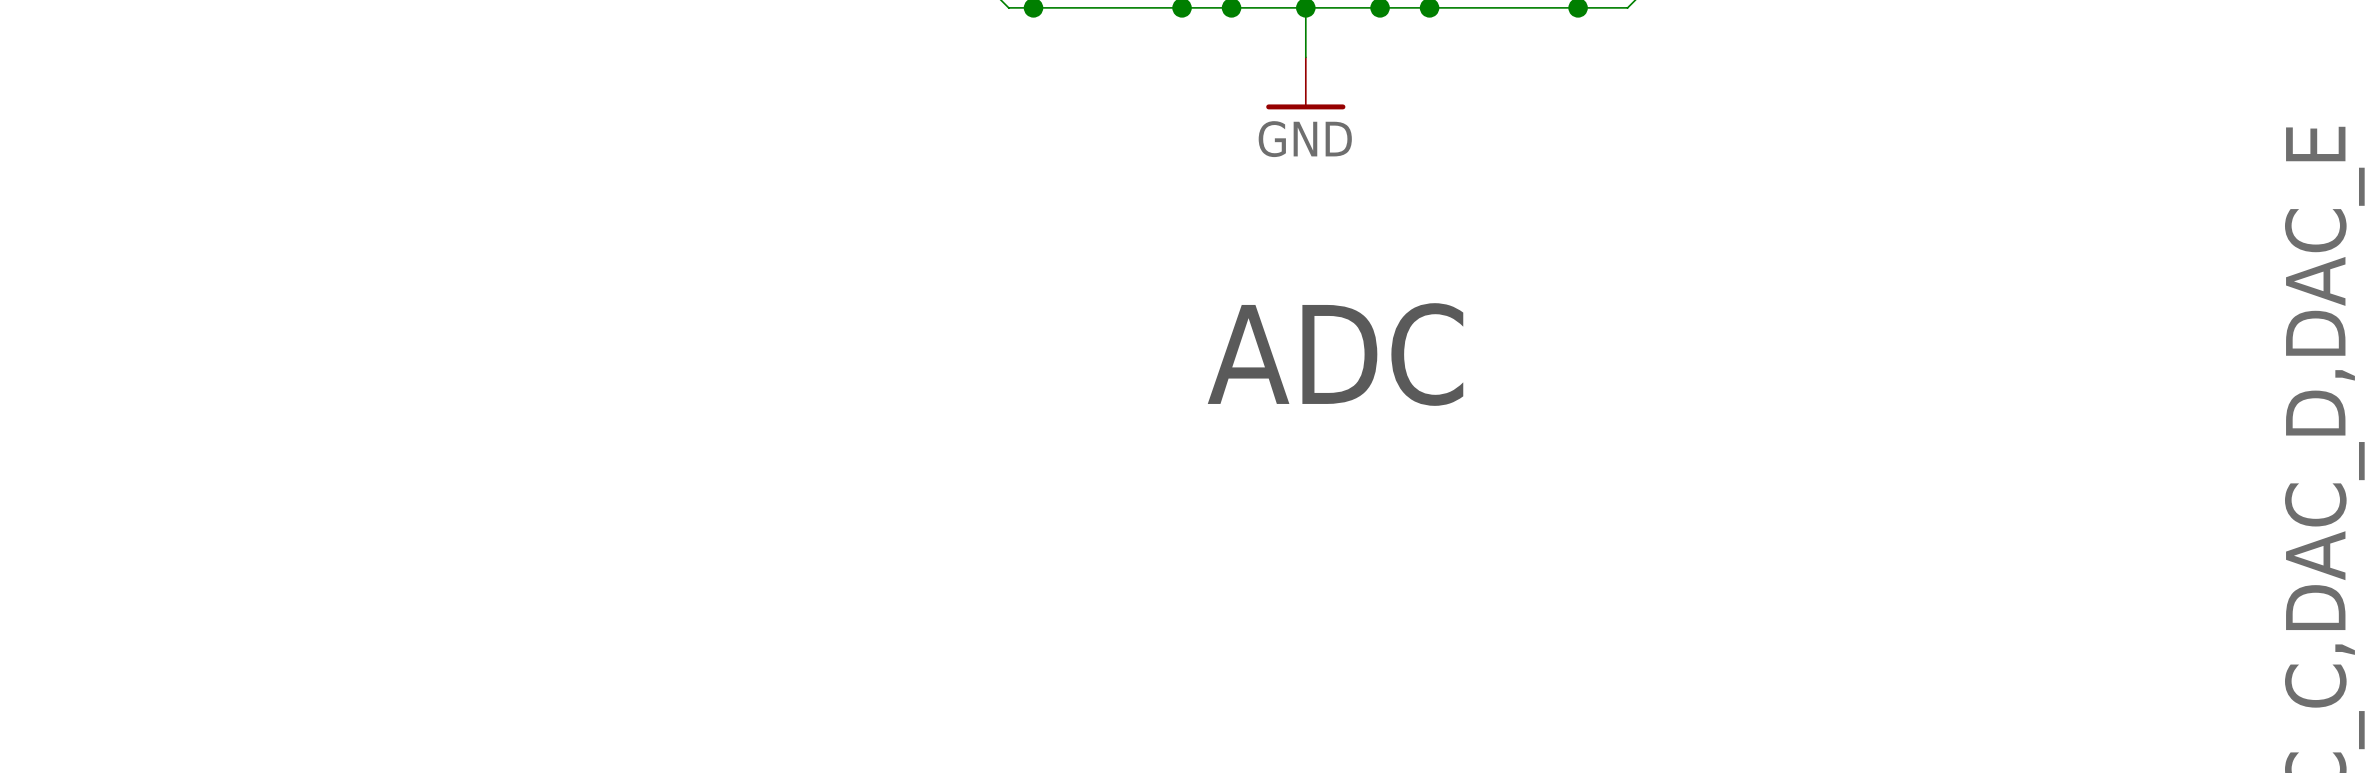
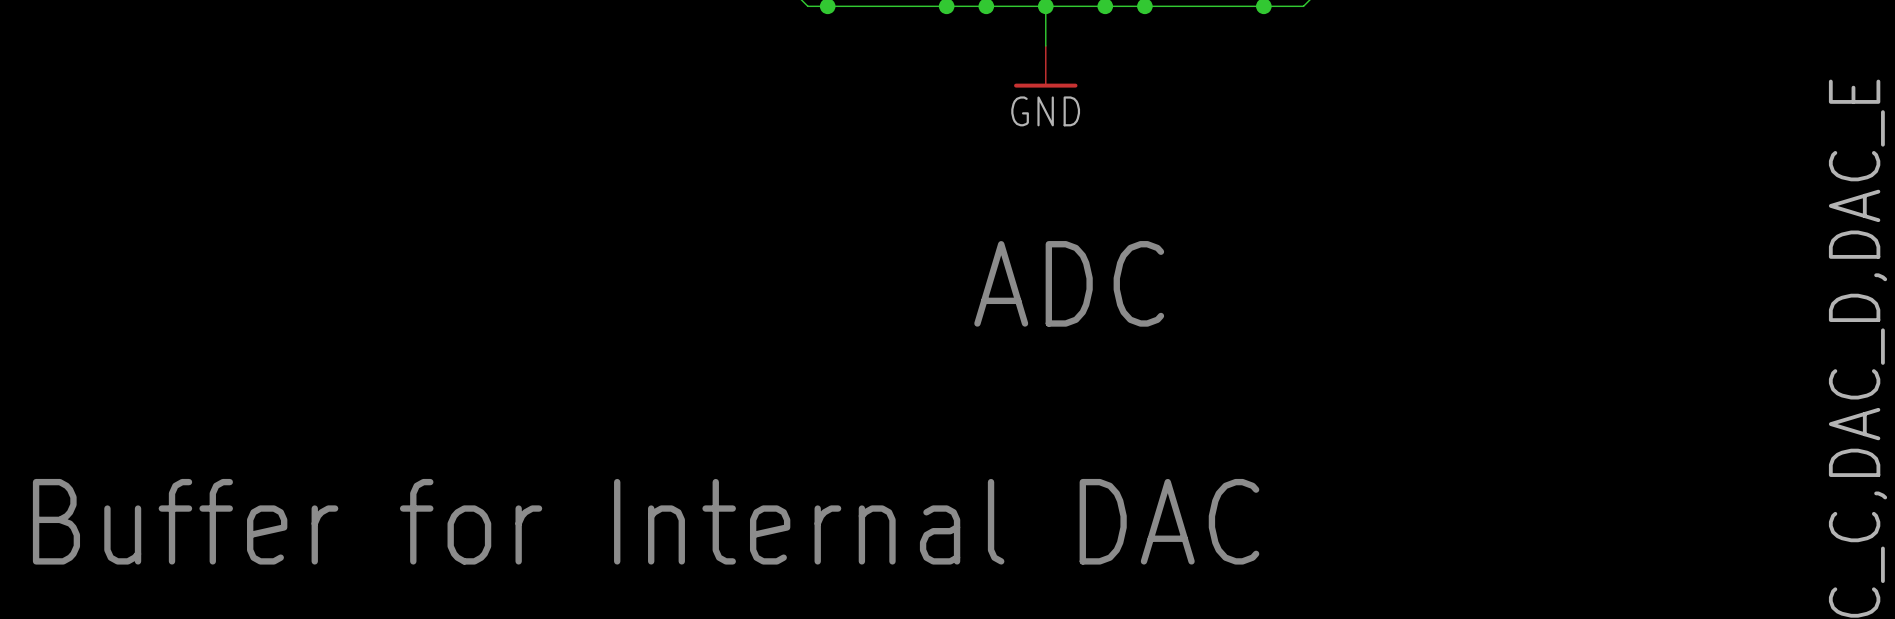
text: none -> Buffer for Internal DAC (646, 521)

